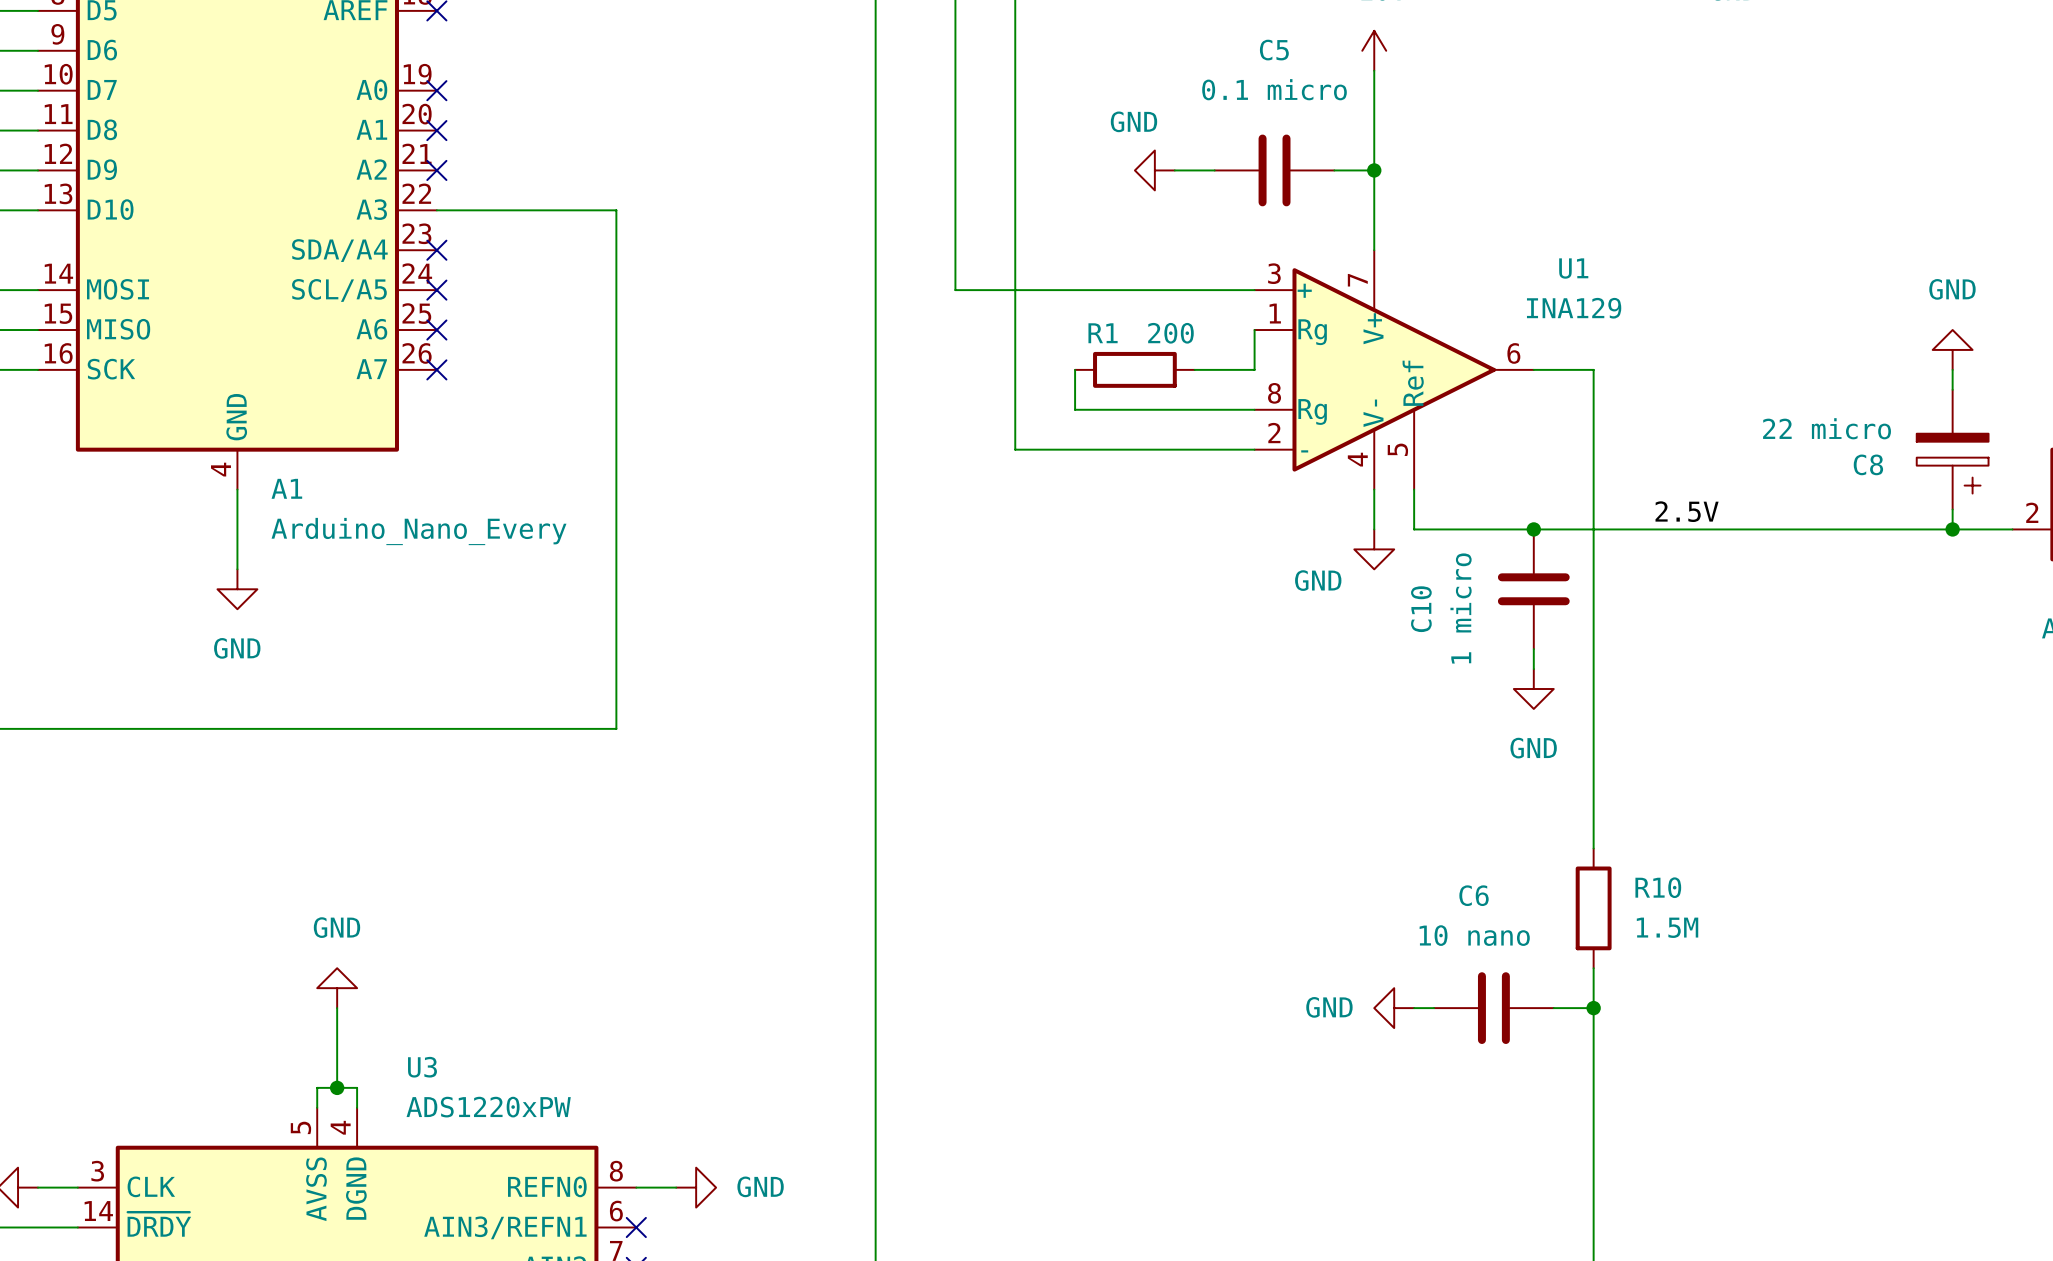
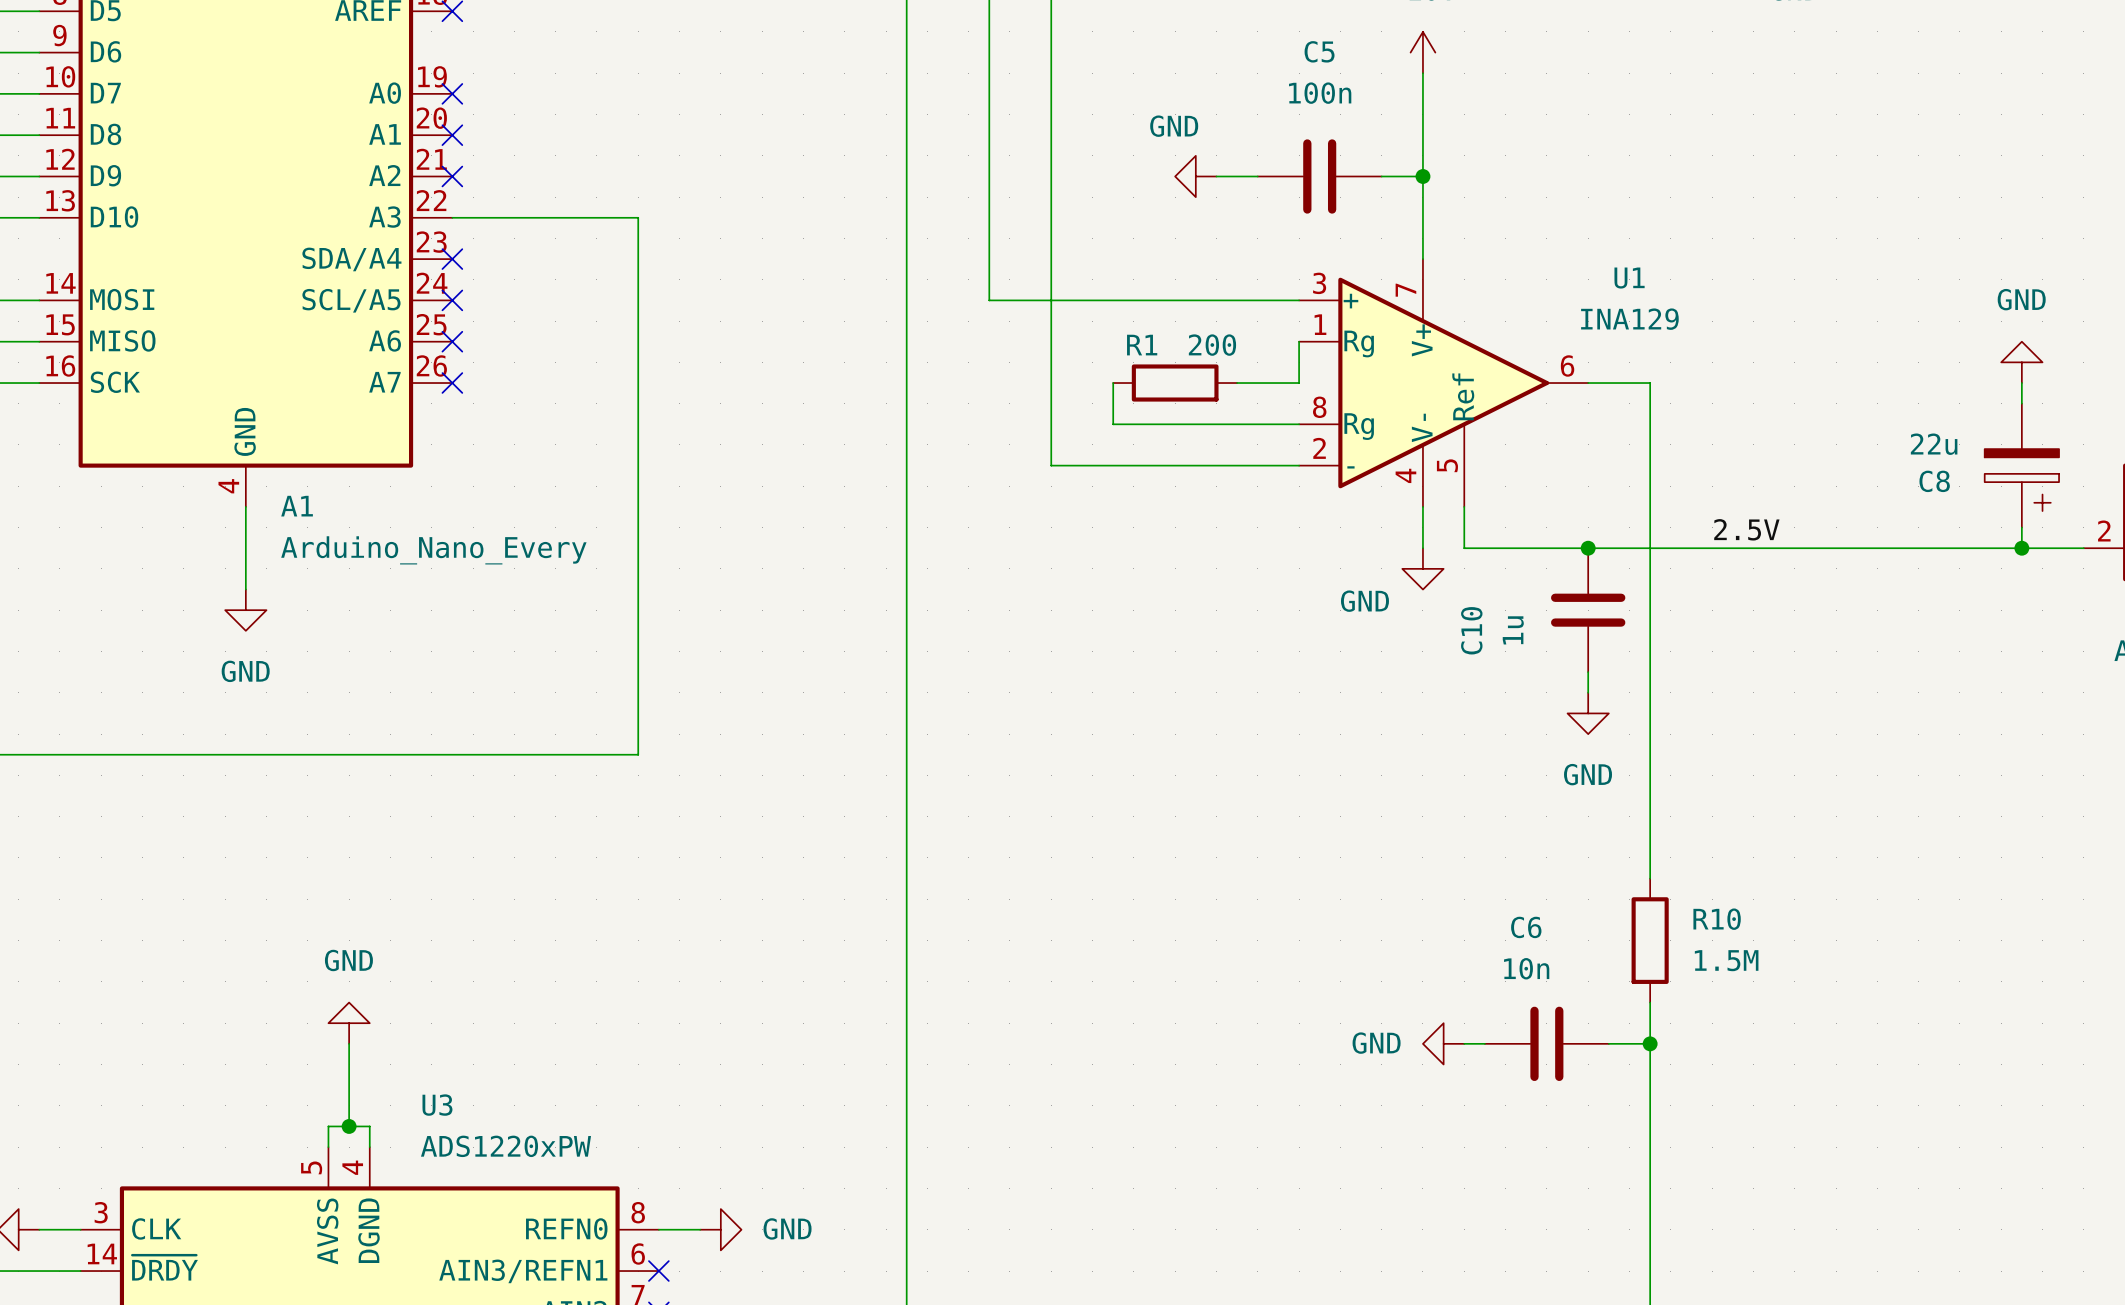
C5 value: 0.1 micro (1274, 89) -> 100n (1320, 93)
C8 value: 22 micro (1827, 428) -> 22u (1934, 444)
C10 value: 1 micro (1461, 608) -> 1u (1513, 630)
C6 value: 10 nano (1474, 935) -> 10n (1526, 968)

